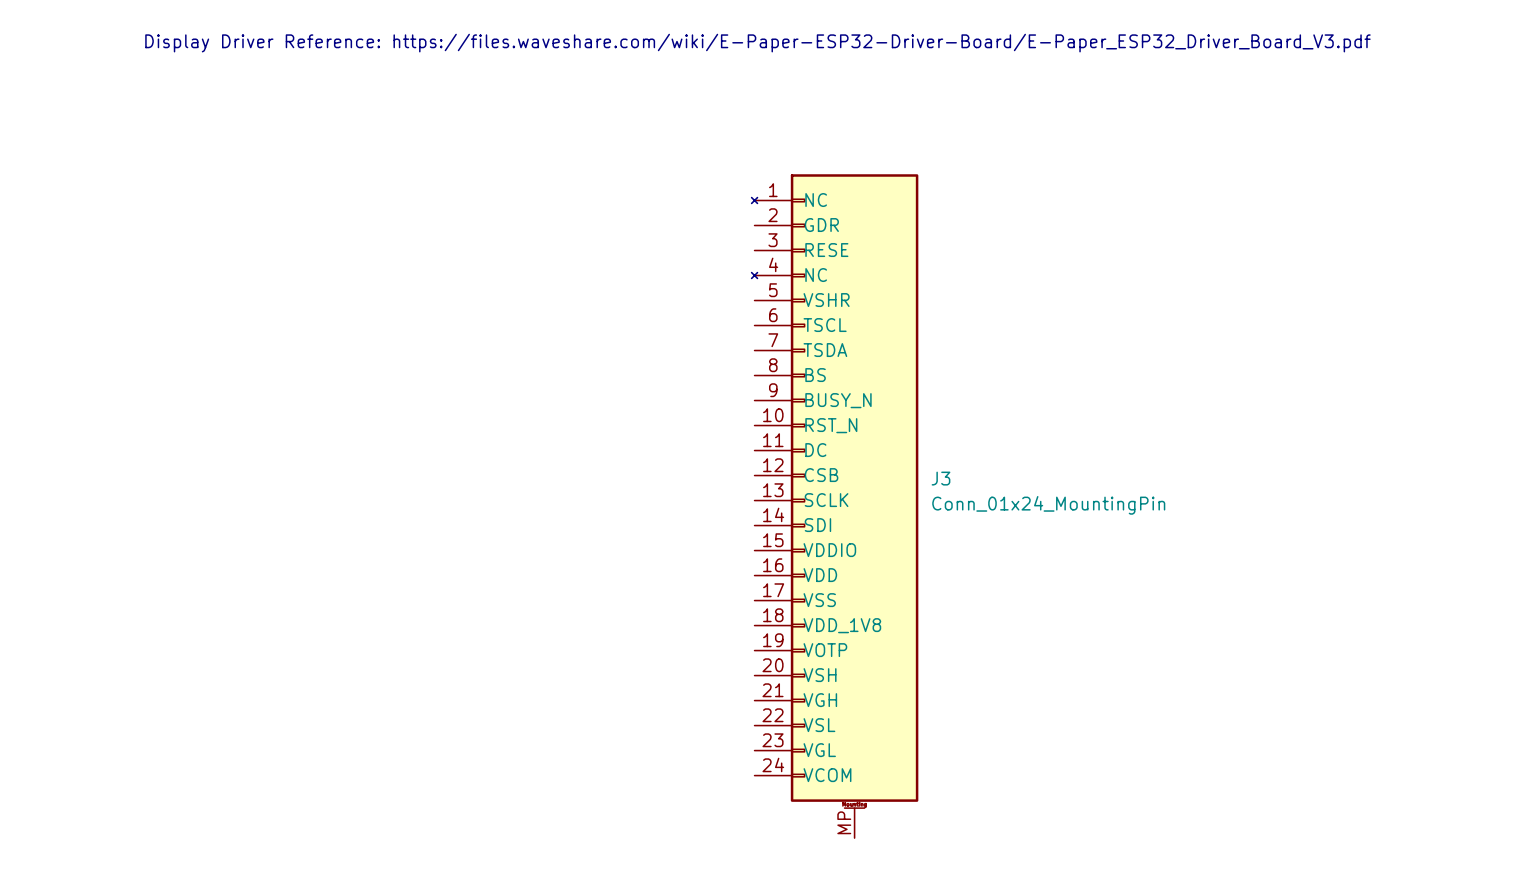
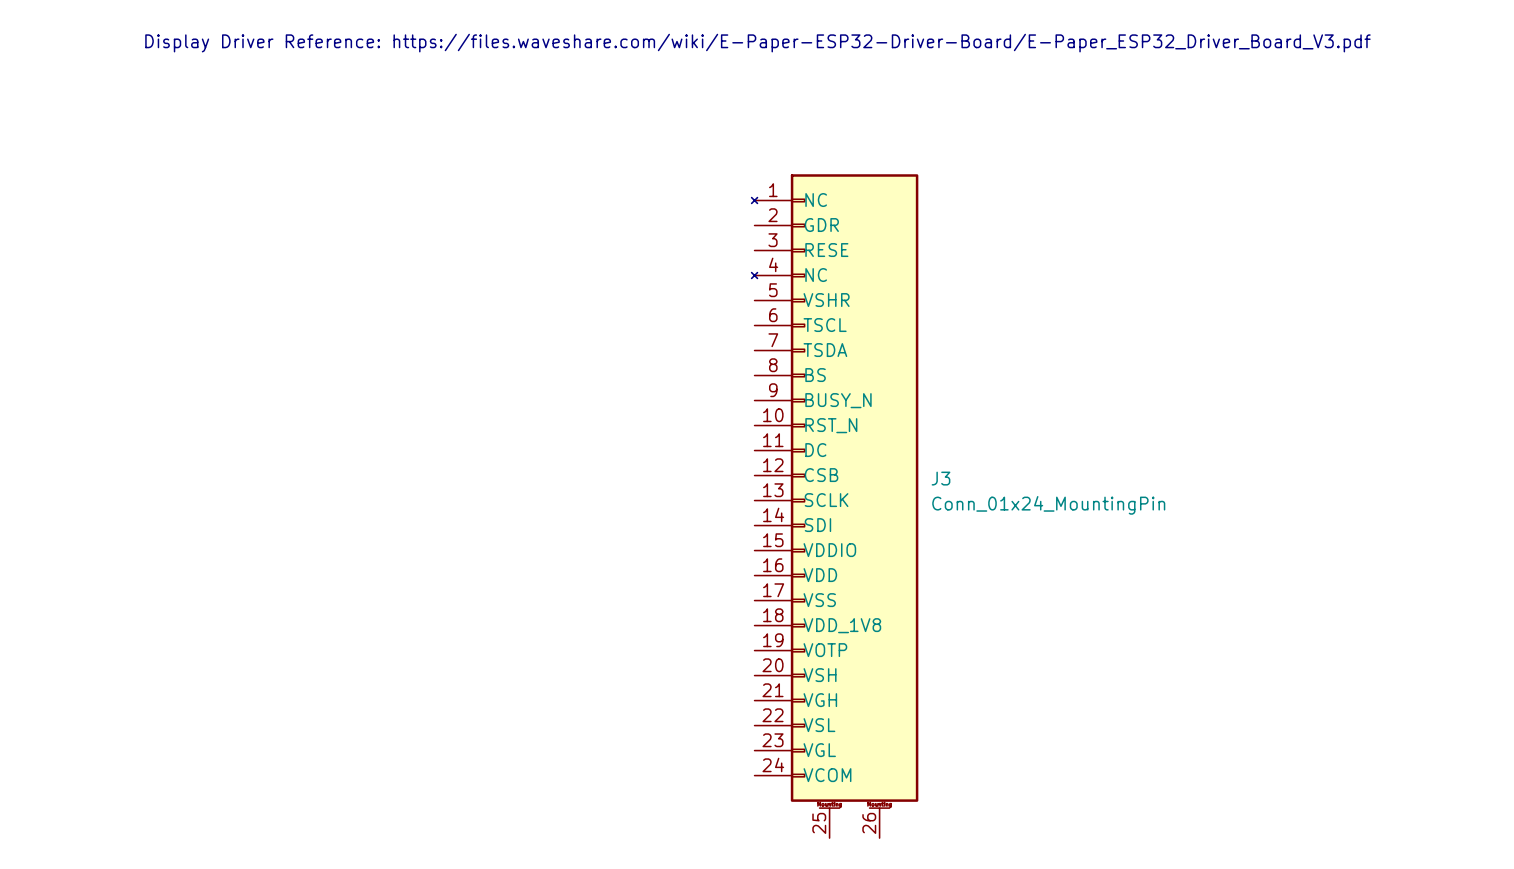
J3 symbol: [751, 174, 919, 839] -> [751, 174, 919, 839]

